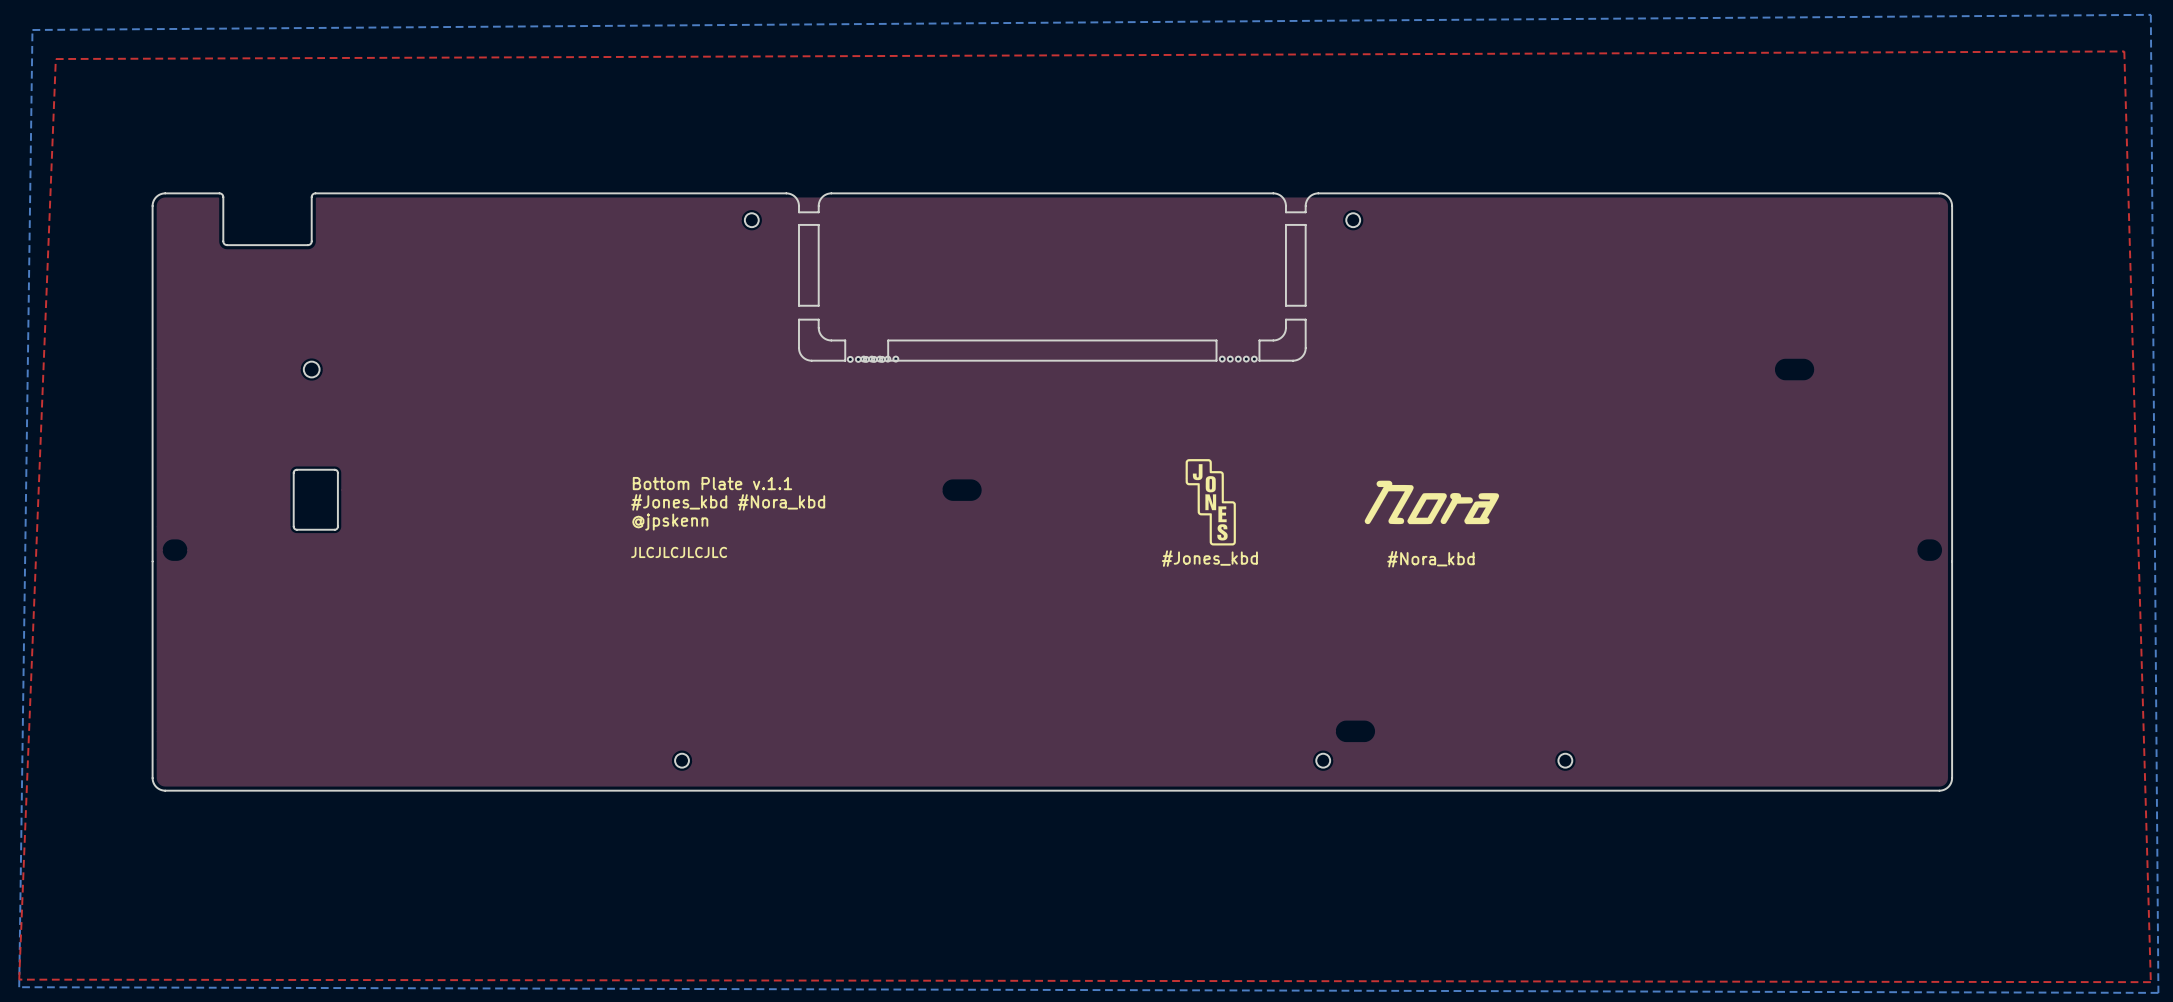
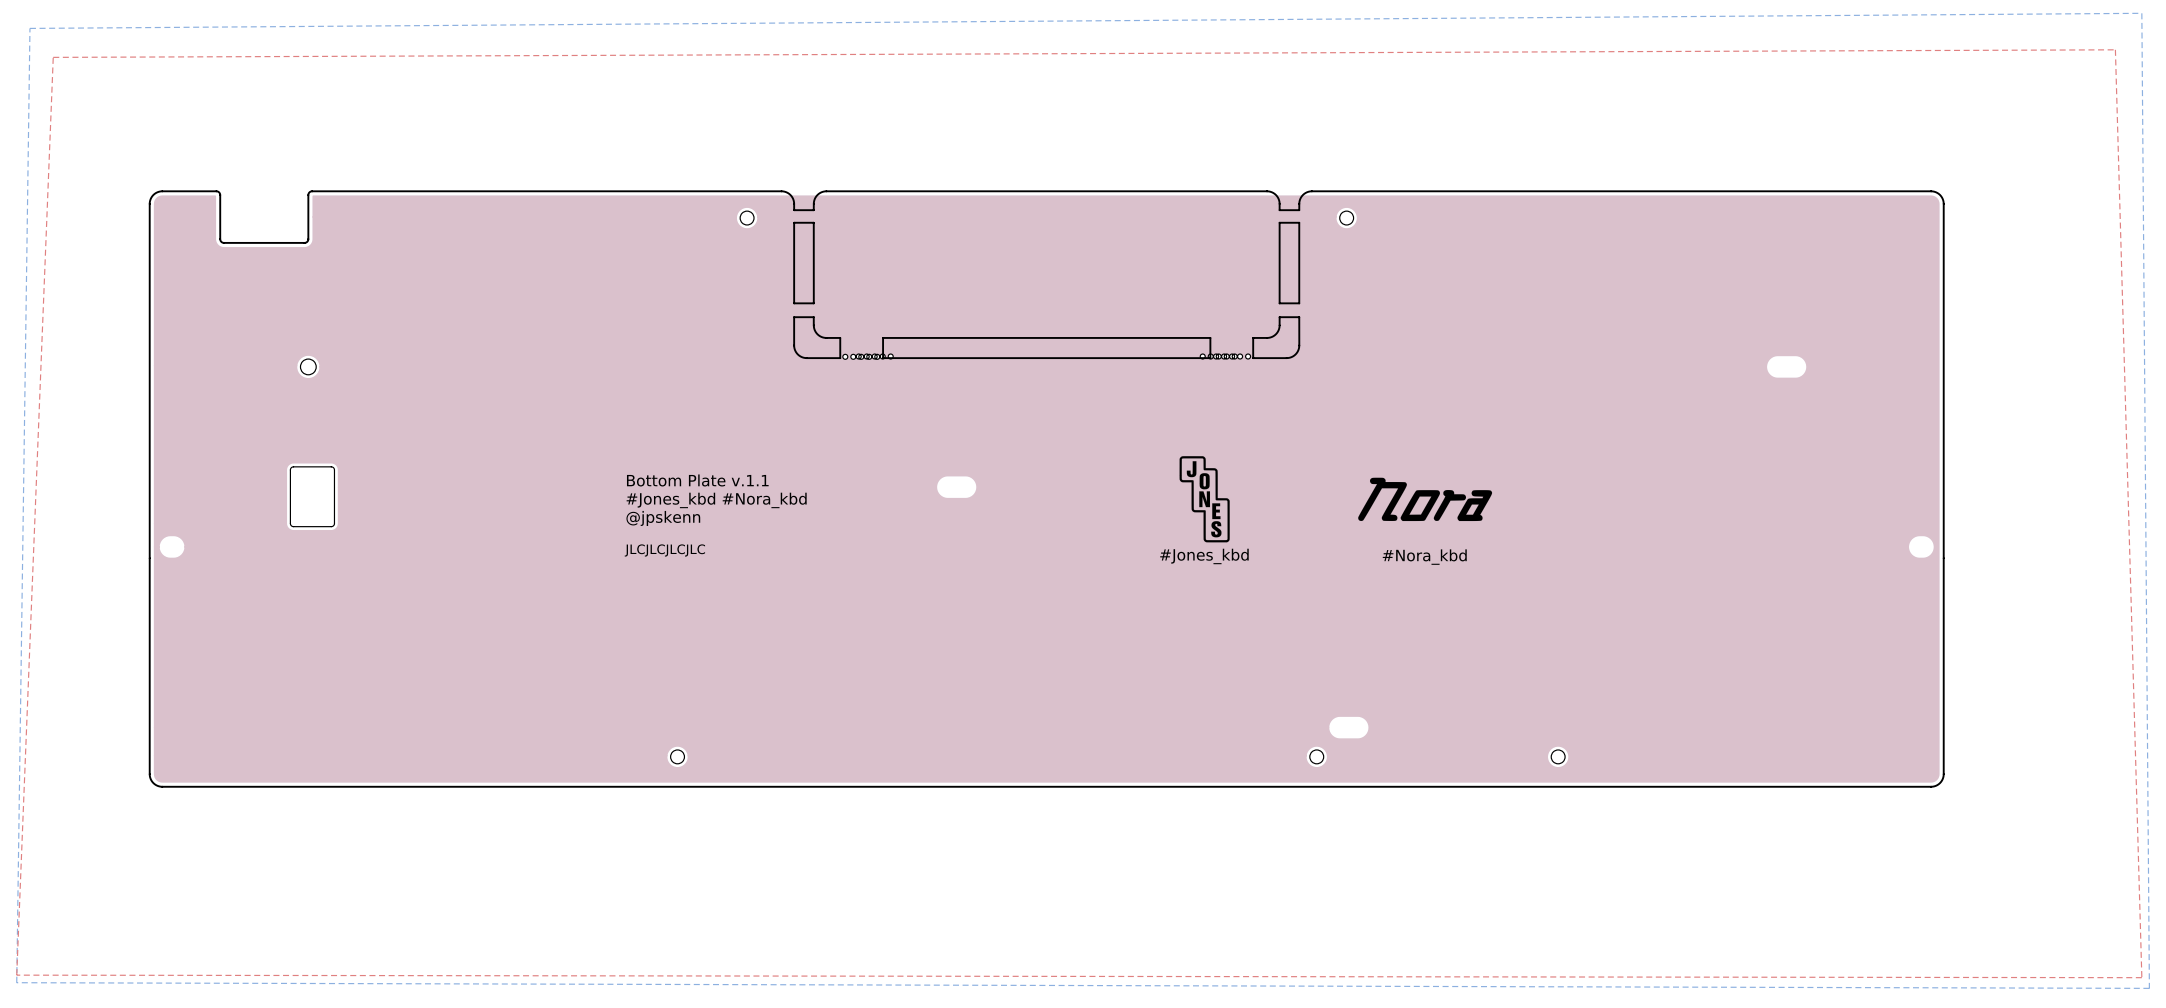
part: none -> (1218, 356)

